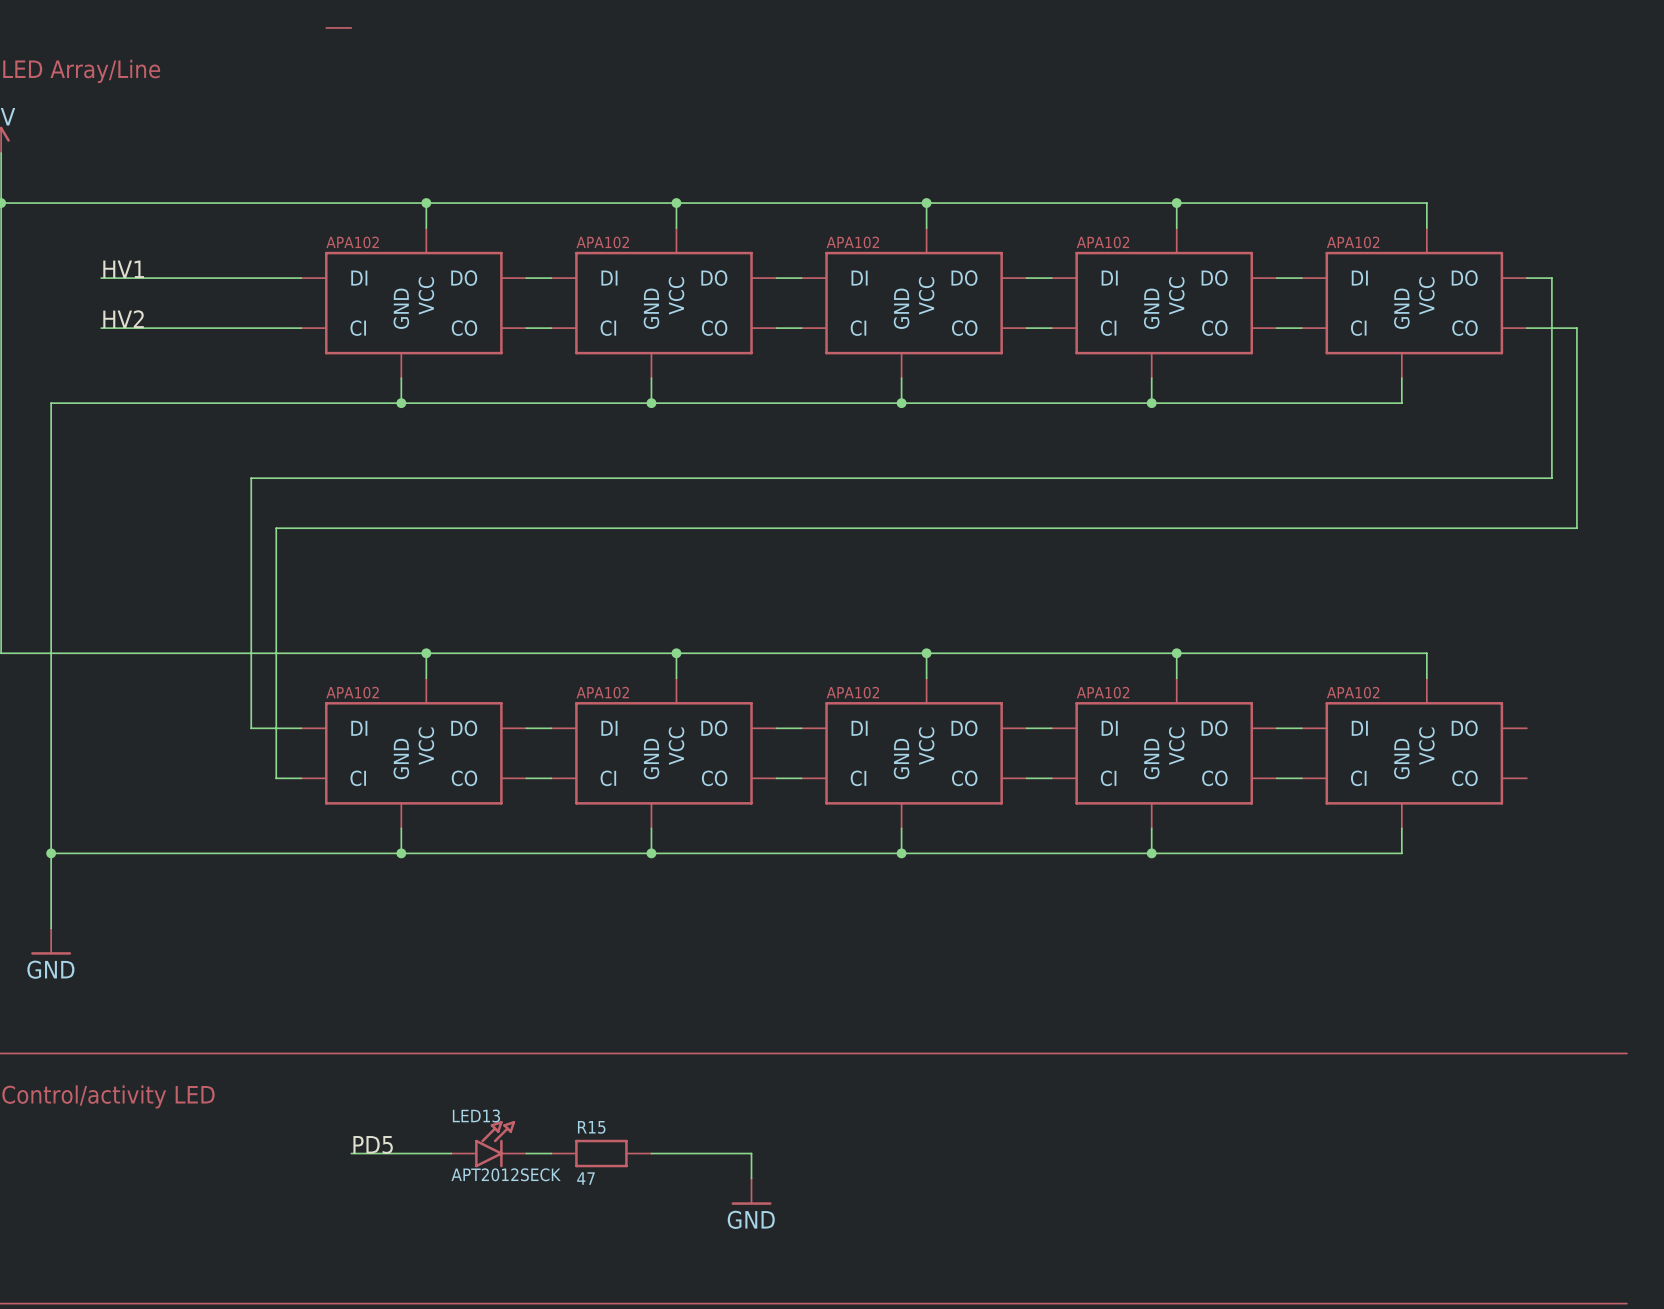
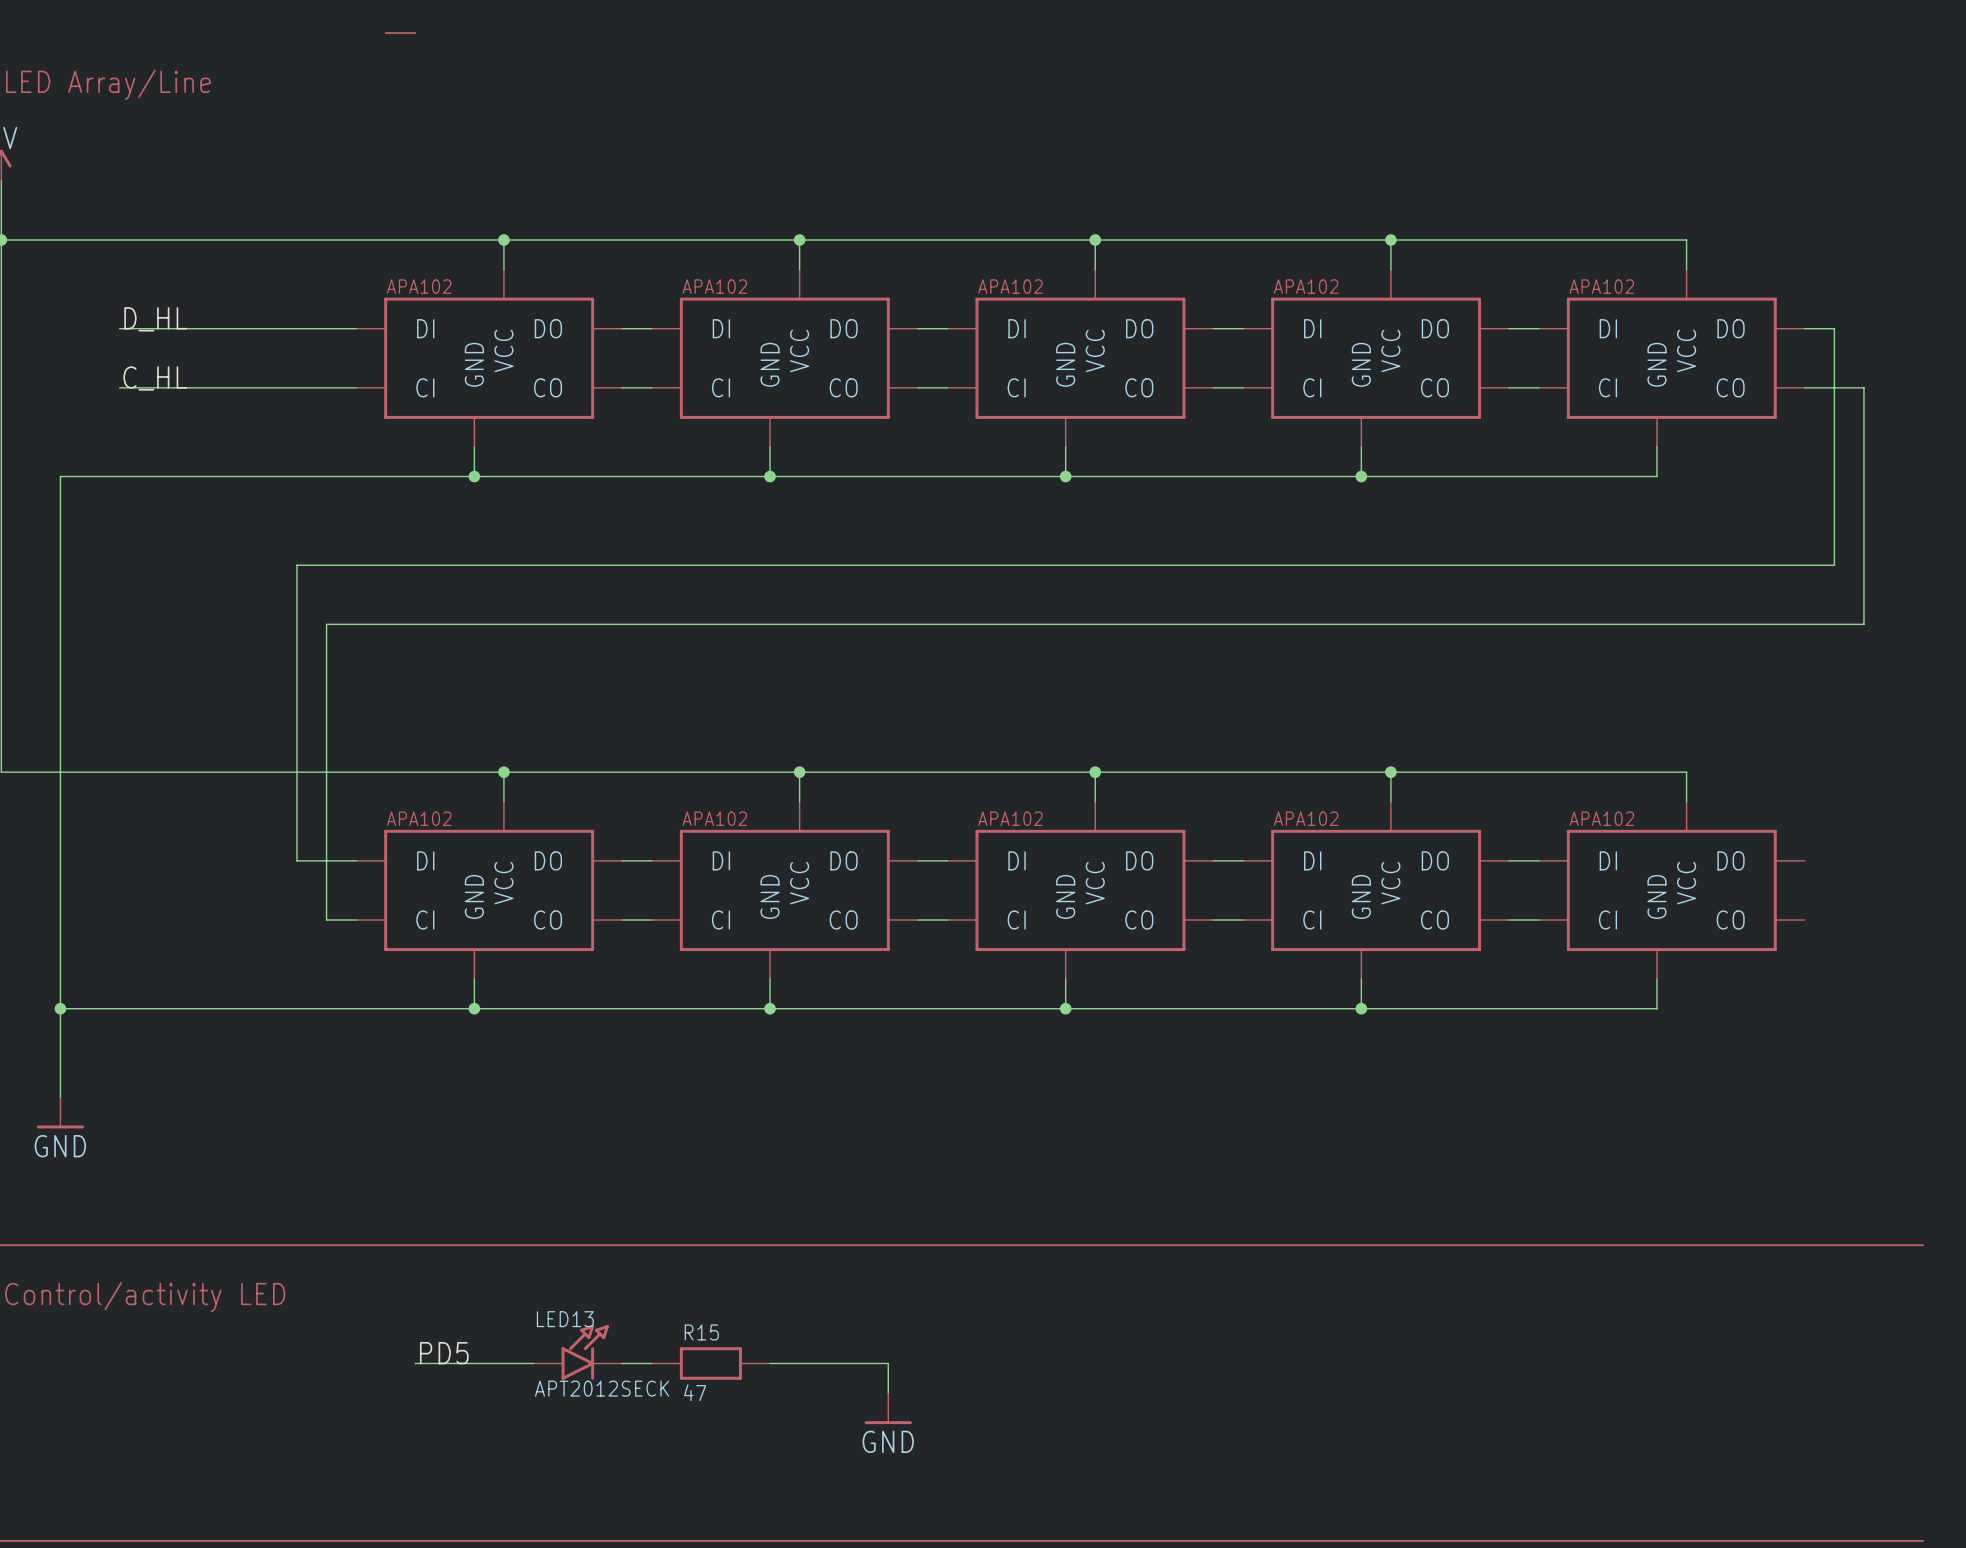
label: HV1 (123, 269) -> D_HL (155, 319)
label: HV2 (123, 319) -> C_HL (155, 378)

